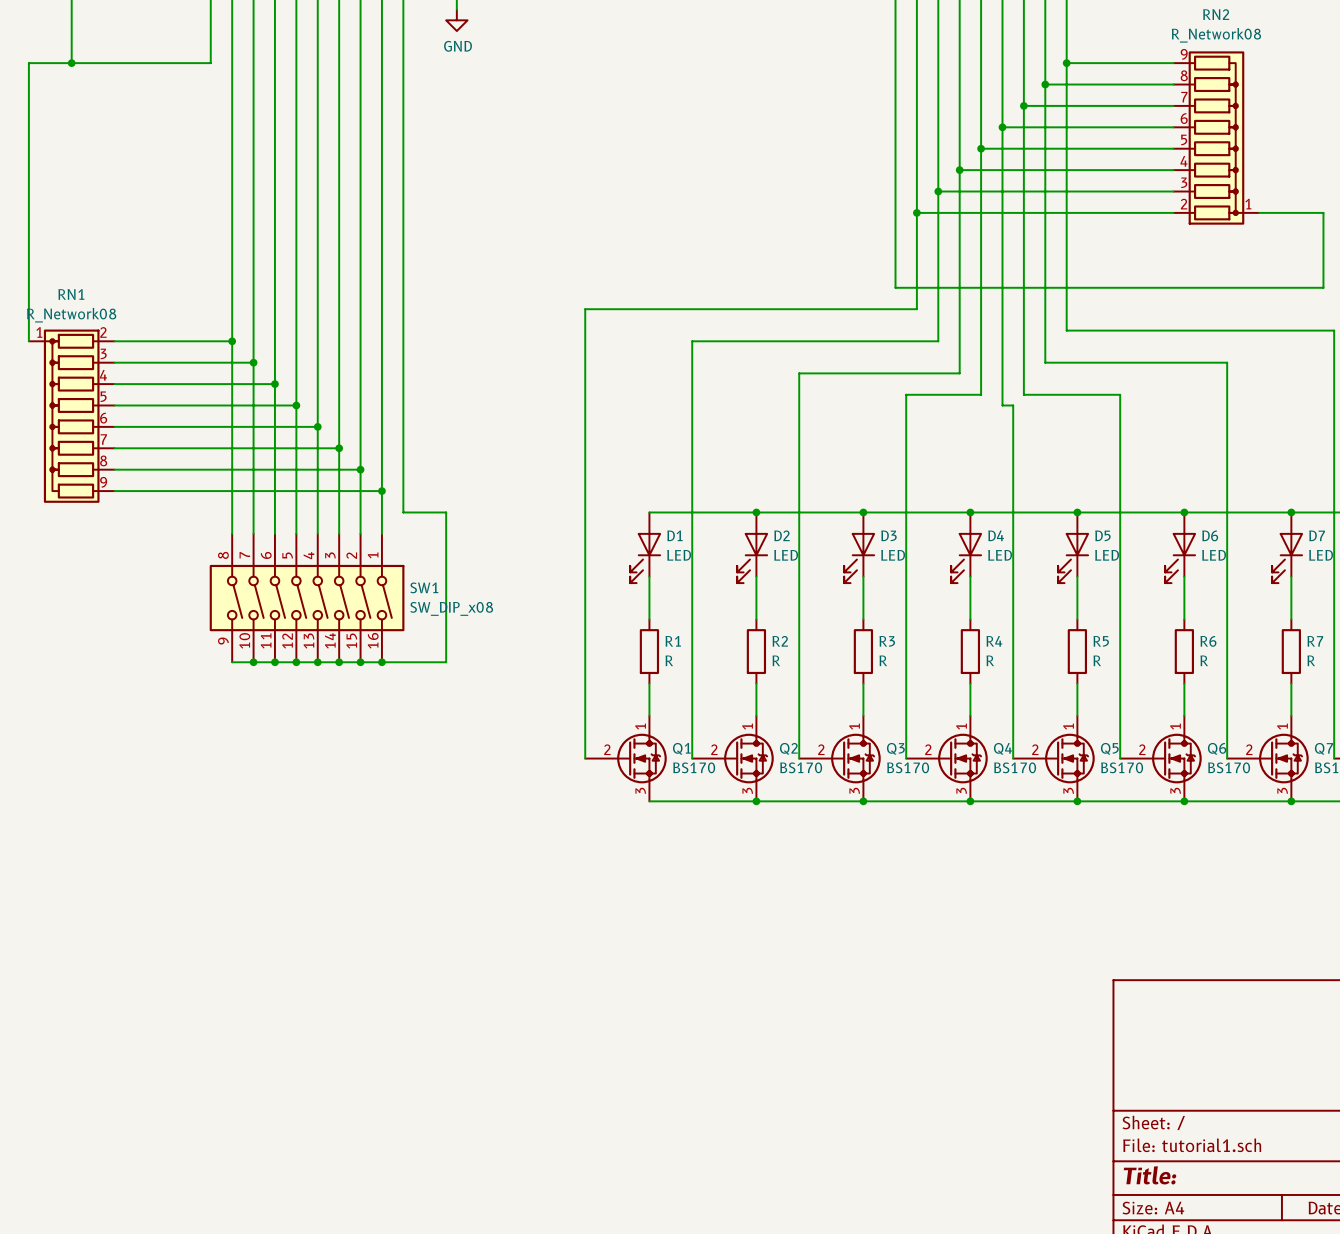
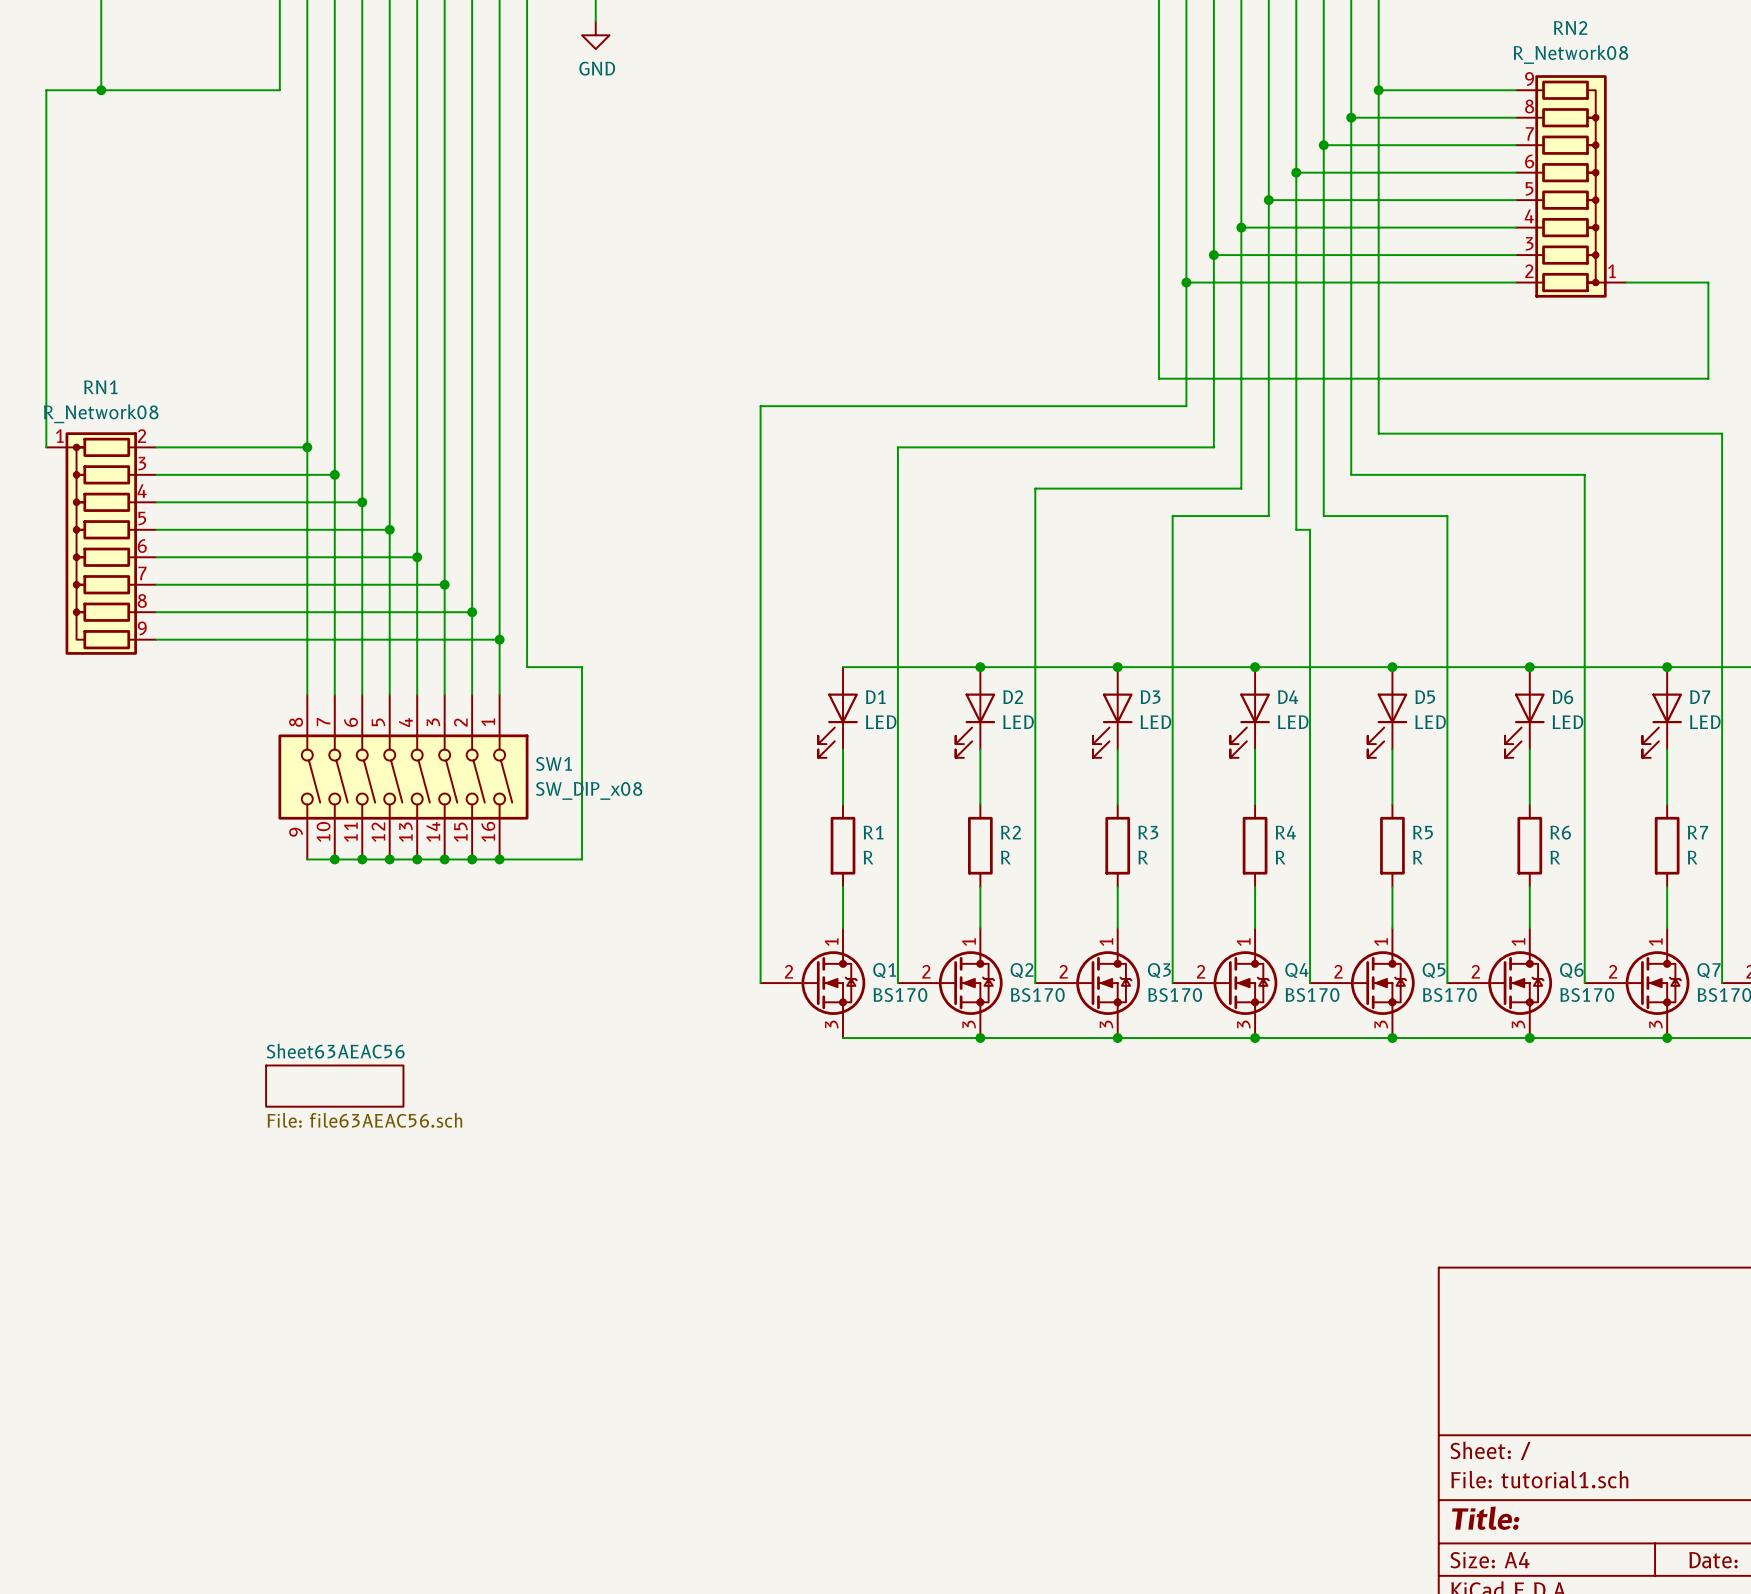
sheet Sheet63AEAC56: none -> File: file63AEAC56.sch (334, 1086)

